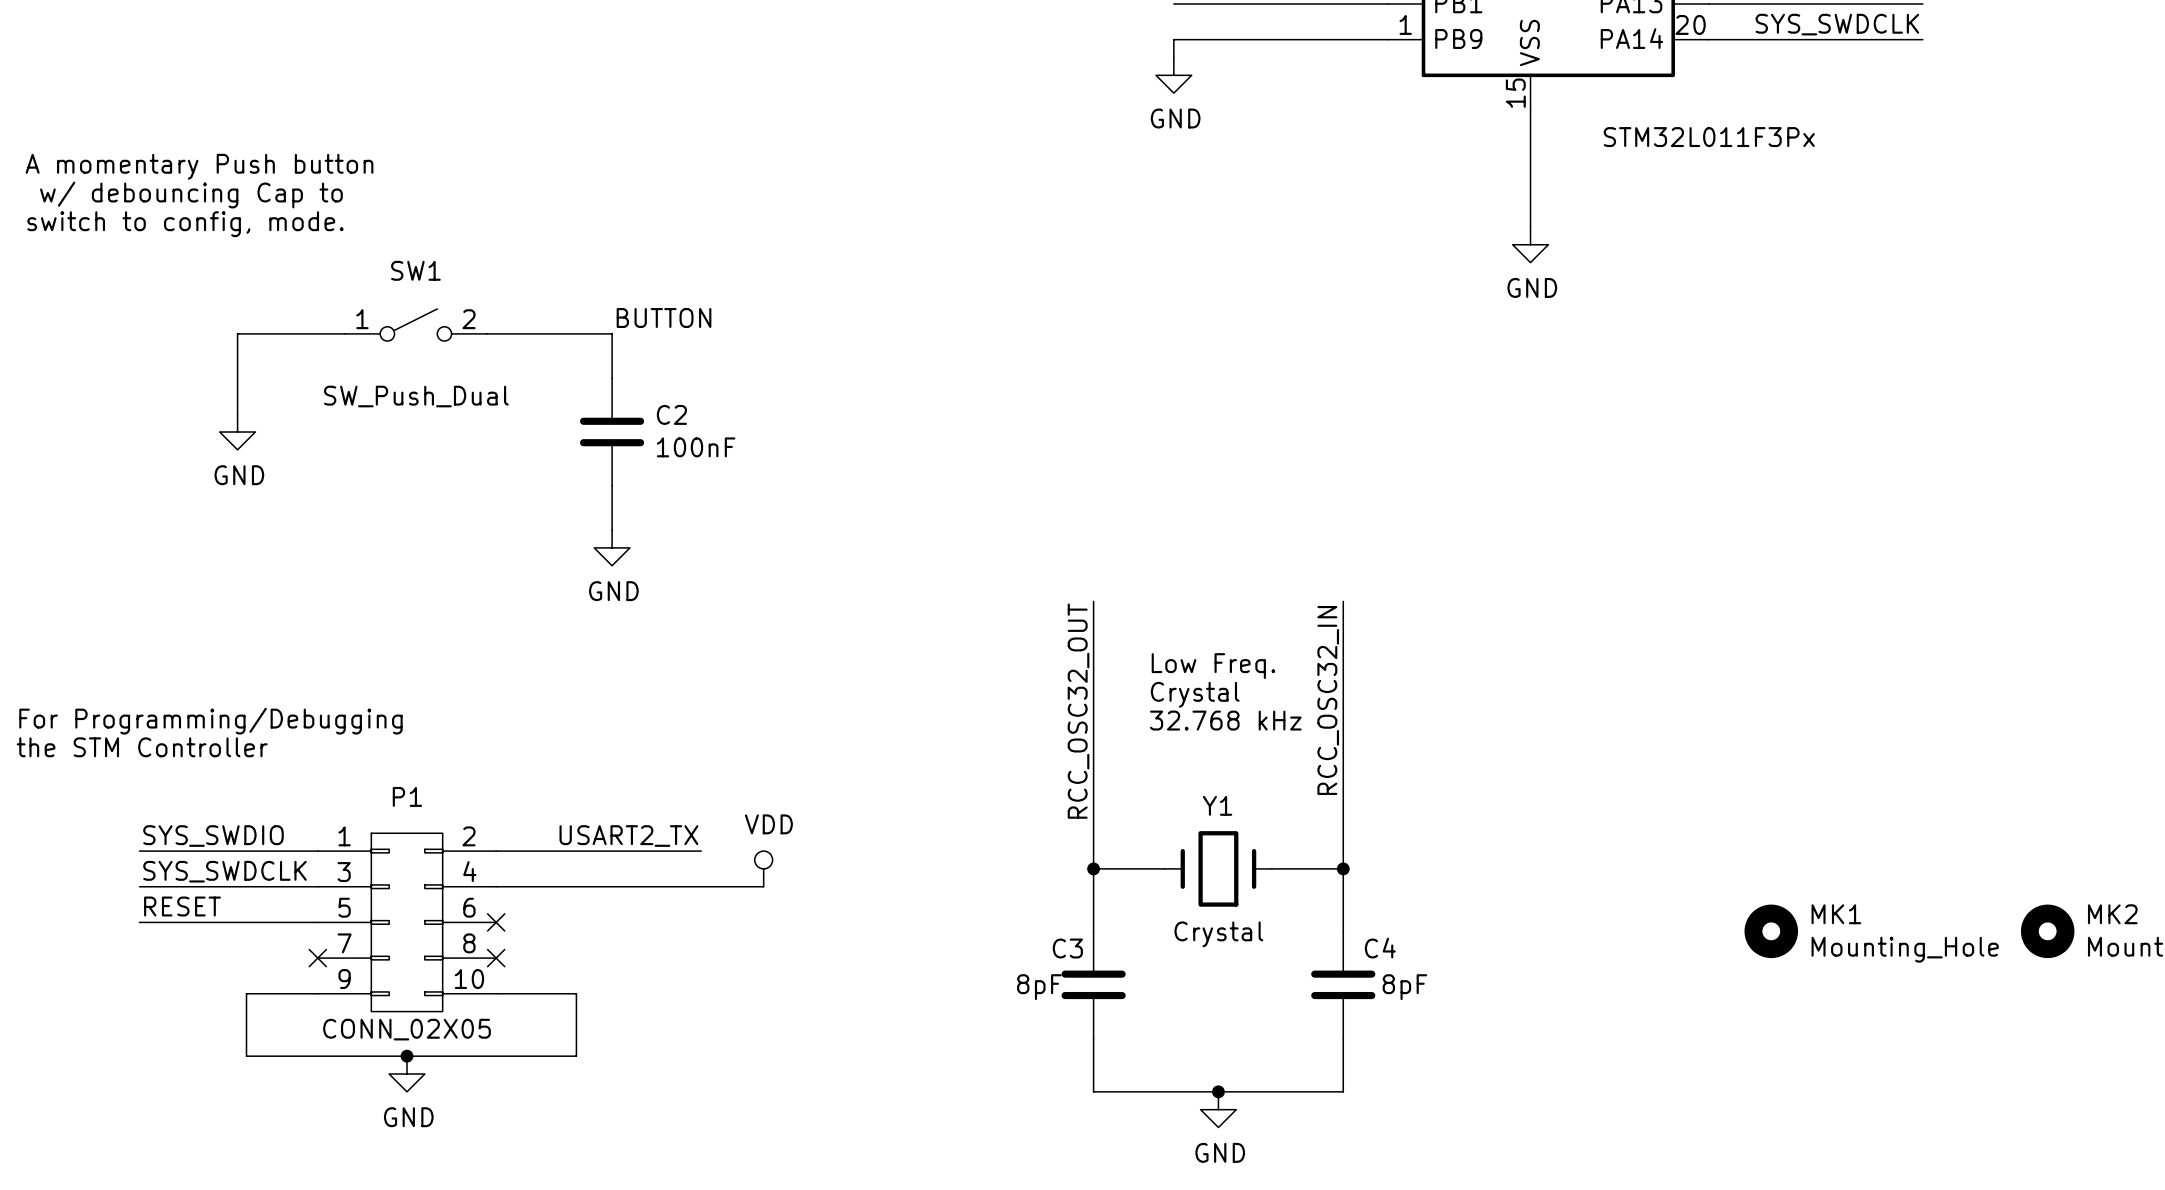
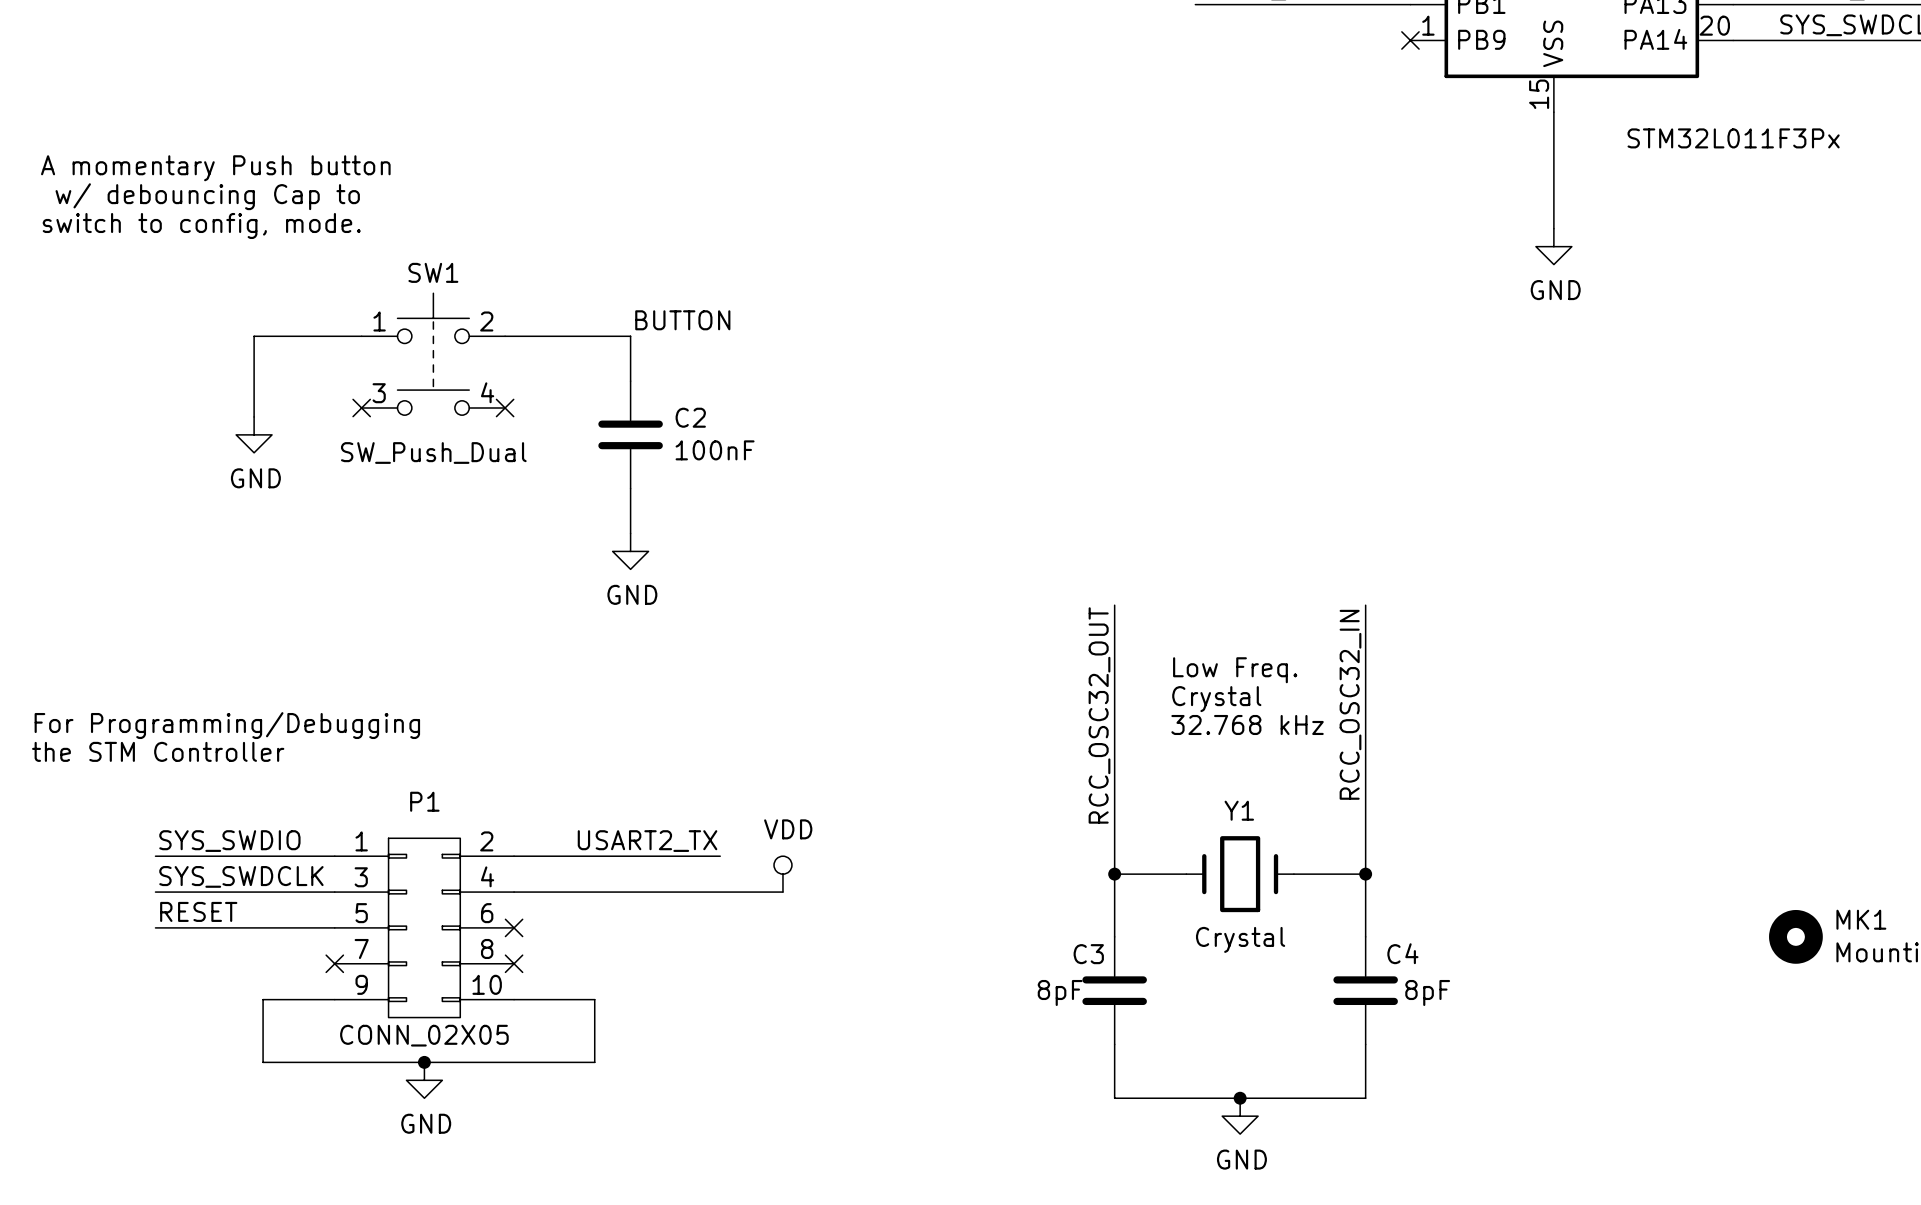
wire: (1387, 39) (1173, 39) (1173, 57) -> none
no-connect mark: none -> (1410, 40)
power symbol: GND (1173, 75) -> none
SW1 symbol: [344, 308, 488, 342] -> [361, 293, 506, 416]
no-connect mark: none -> (361, 408)
no-connect mark: none -> (505, 408)

